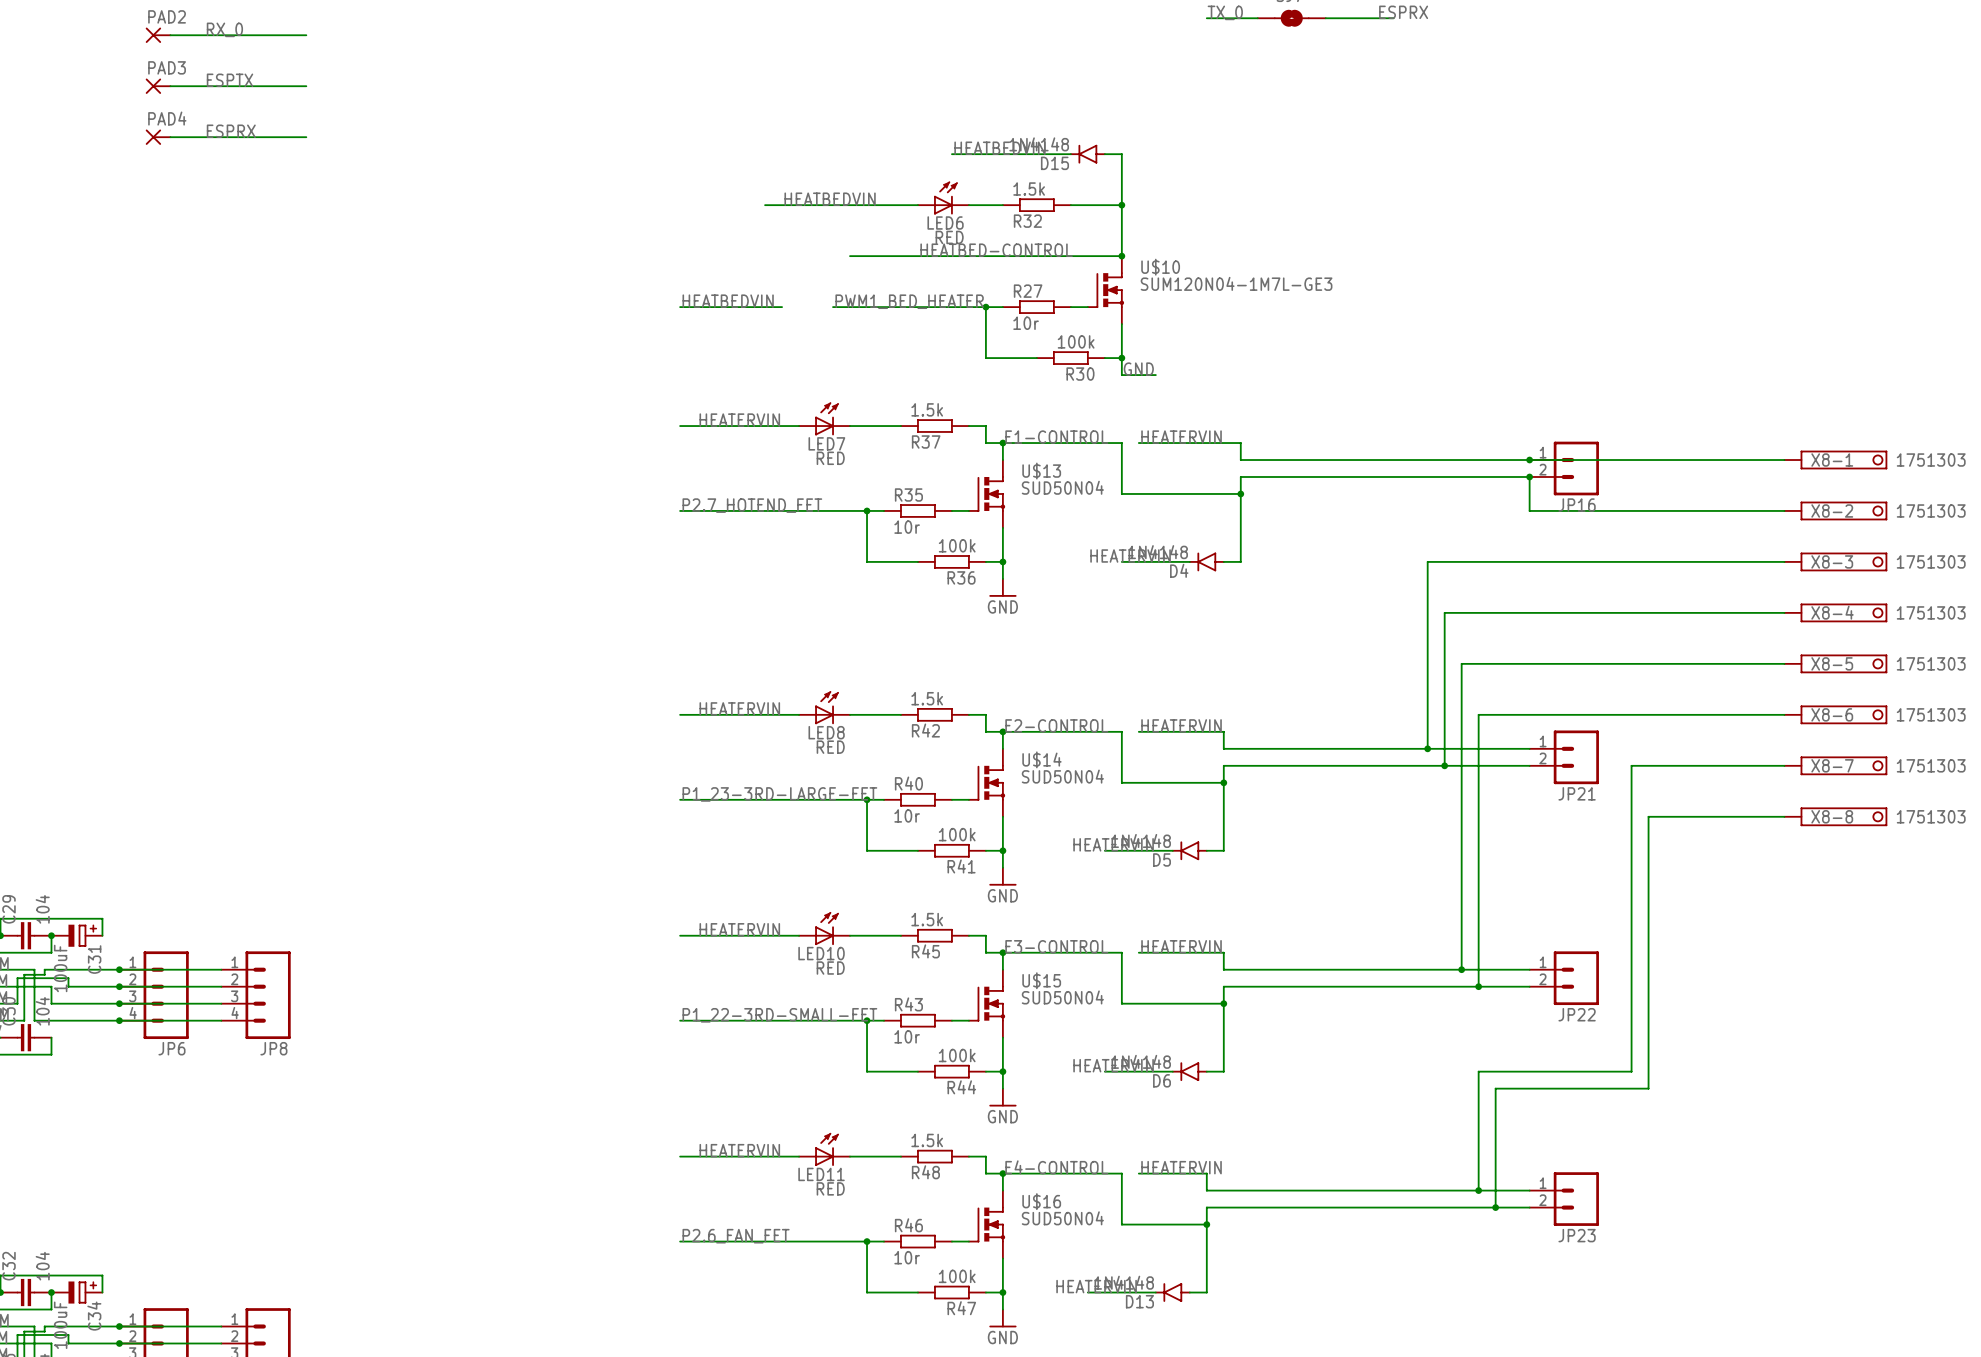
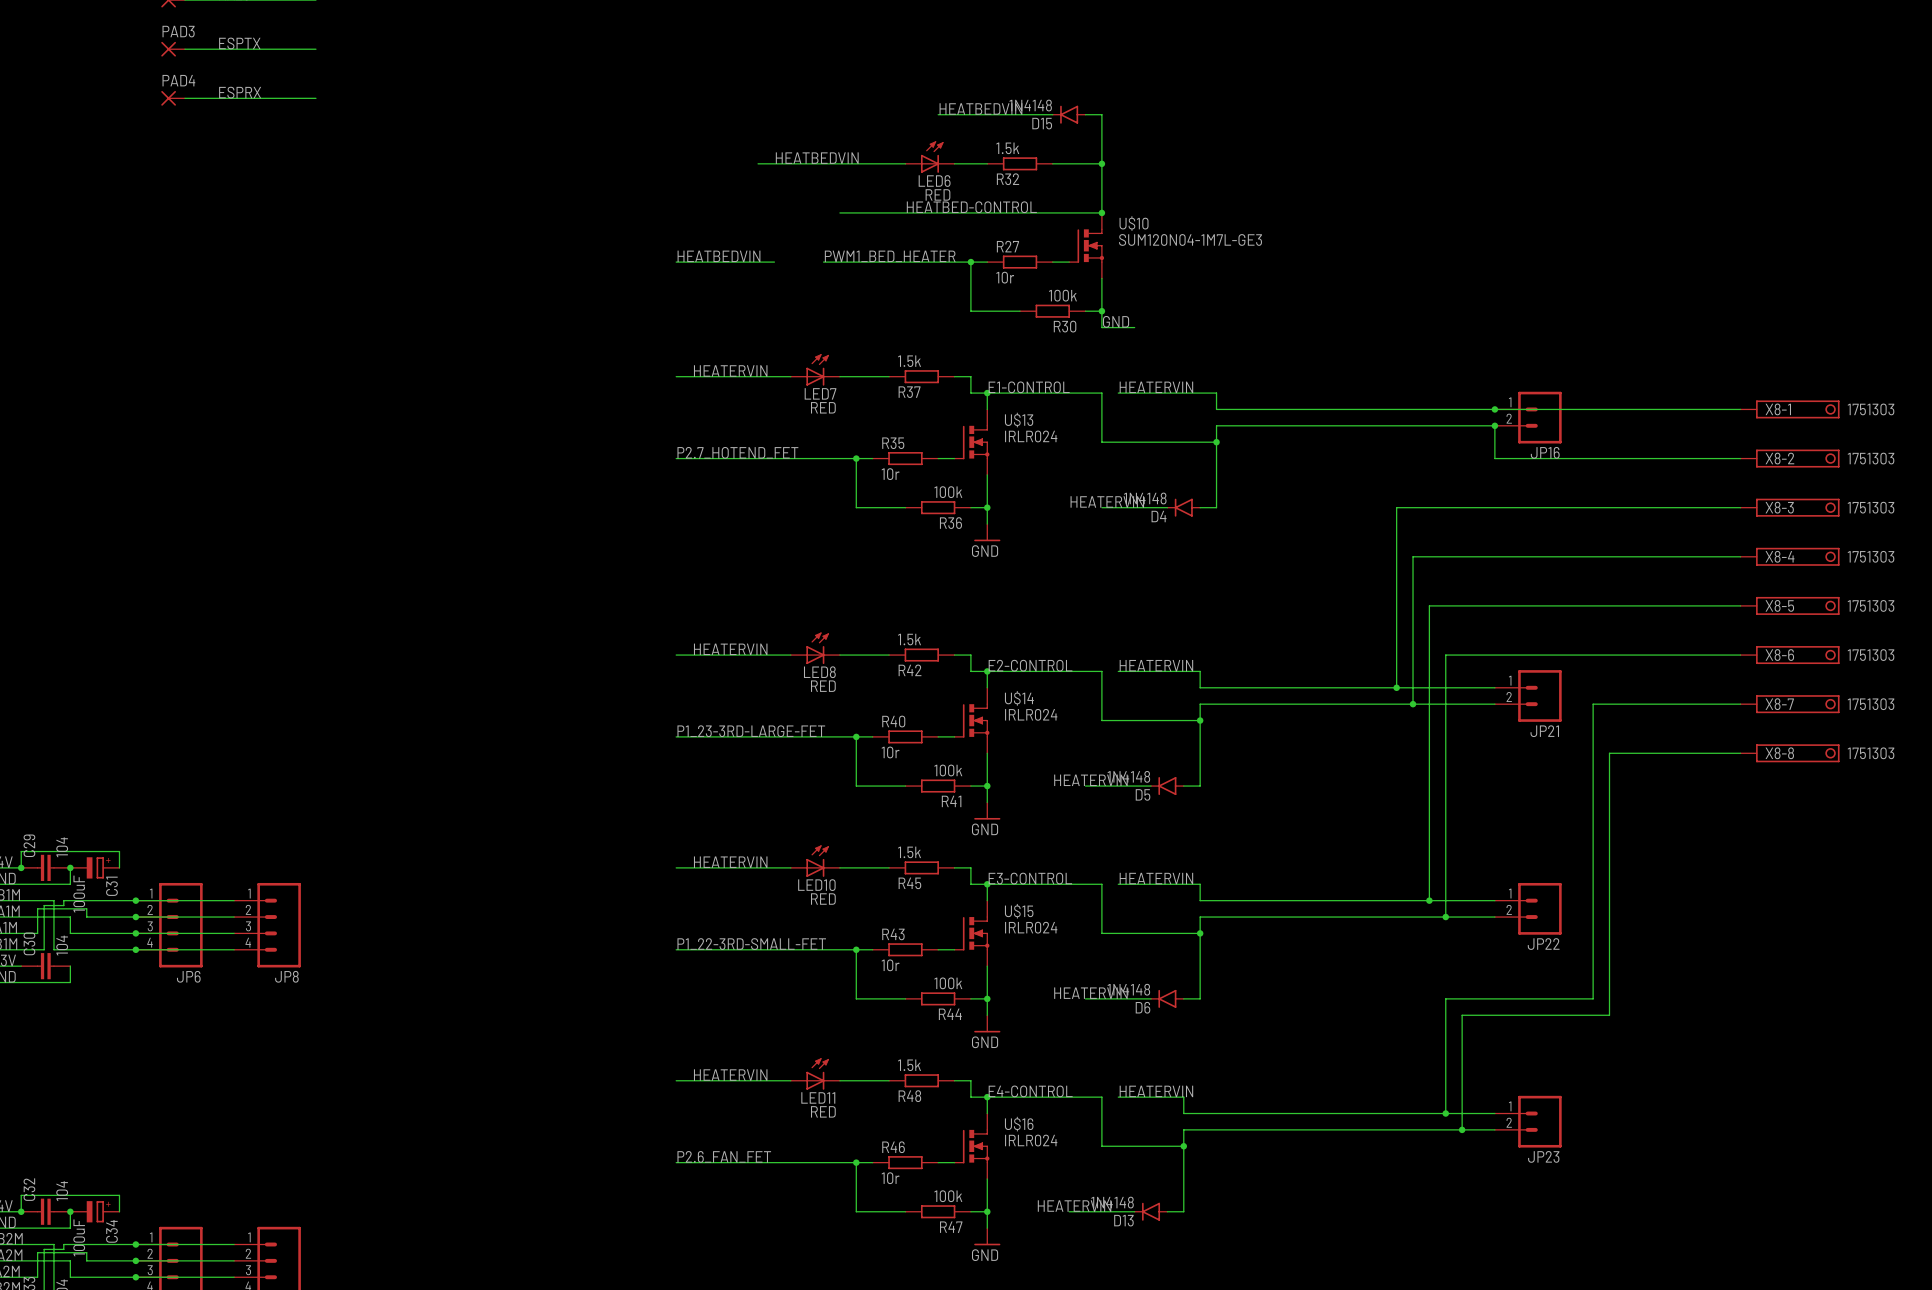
U$13 value: SUD50N04 (1062, 487) -> IRLR024 (1031, 436)
U$14 value: SUD50N04 (1062, 776) -> IRLR024 (1031, 714)
U$15 value: SUD50N04 (1062, 997) -> IRLR024 (1031, 927)
U$16 value: SUD50N04 (1062, 1218) -> IRLR024 (1031, 1140)

